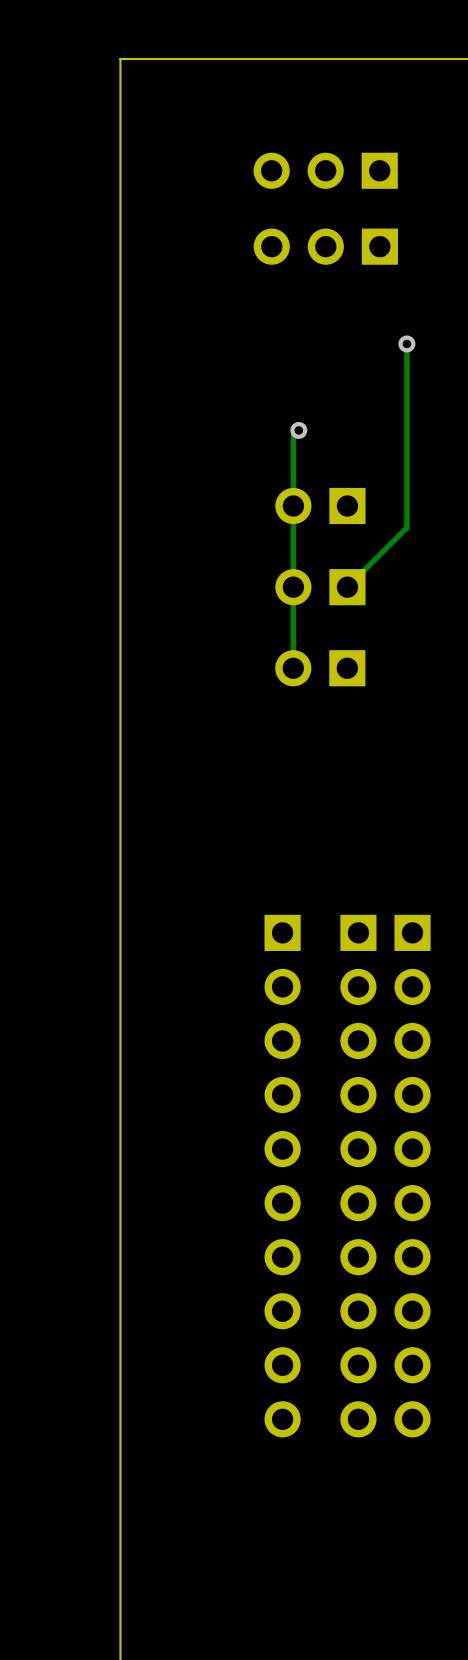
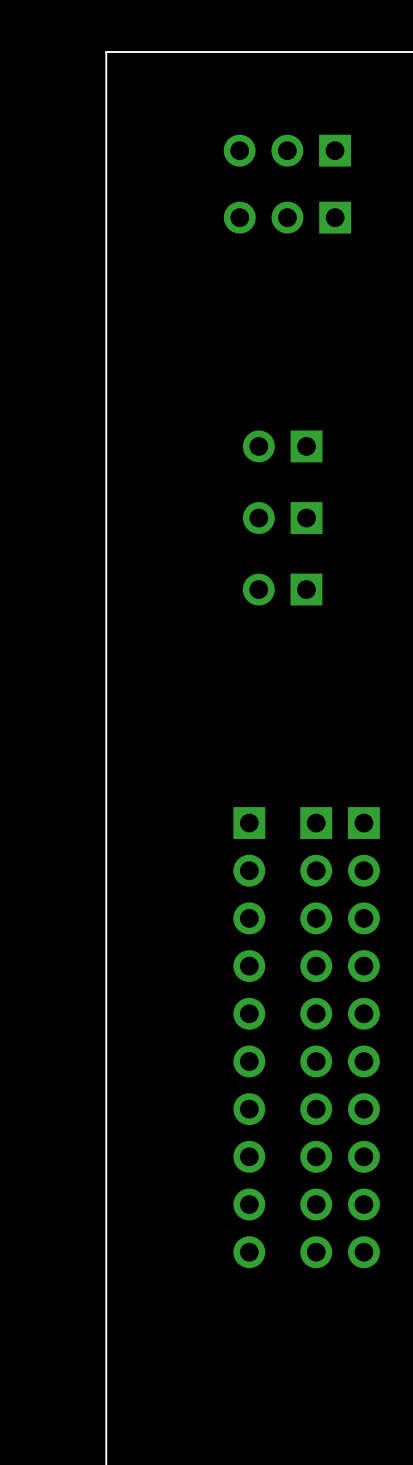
track: (406, 343) (406, 527) (347, 587) -> none
via: (406, 343) -> none
track: (298, 430) (293, 435) (293, 506) -> none
via: (298, 430) -> none
track: (293, 506) (293, 668) -> none

